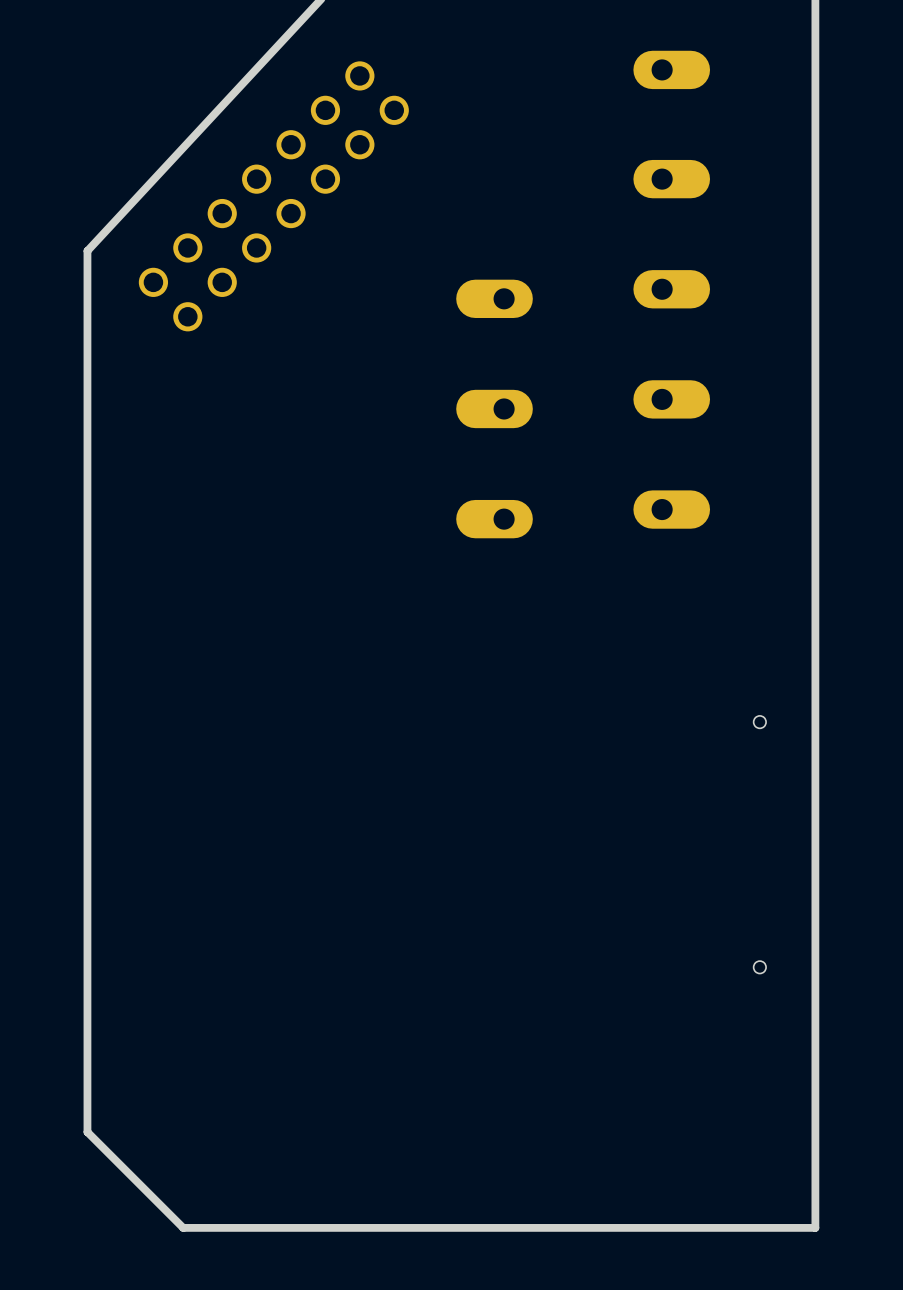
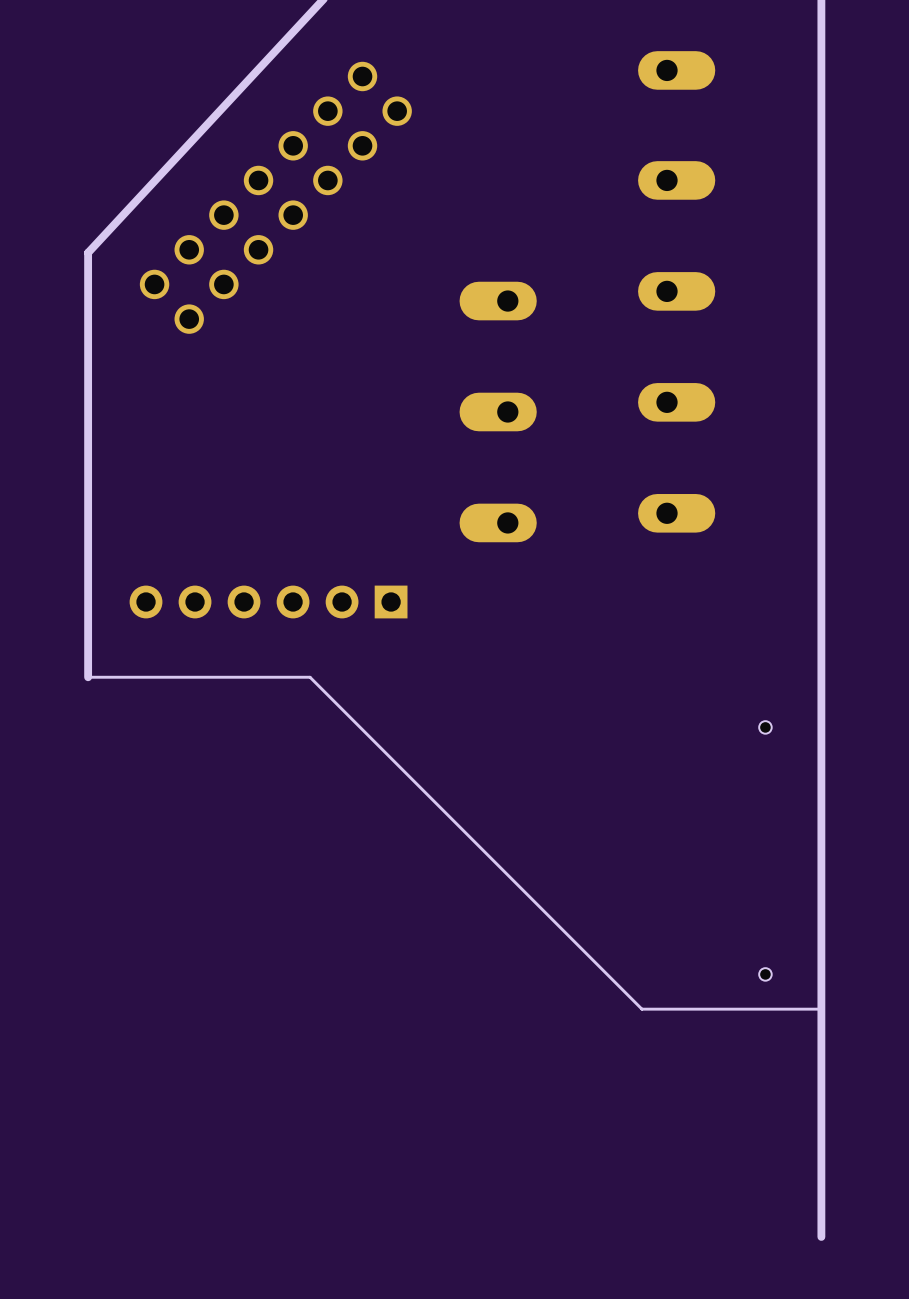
board edge: (87, 250) (87, 1132) (183, 1227) (815, 1227) -> (88, 252) (88, 677) (310, 677) (641, 1009) (821, 1009)
part: none -> (268, 601)

